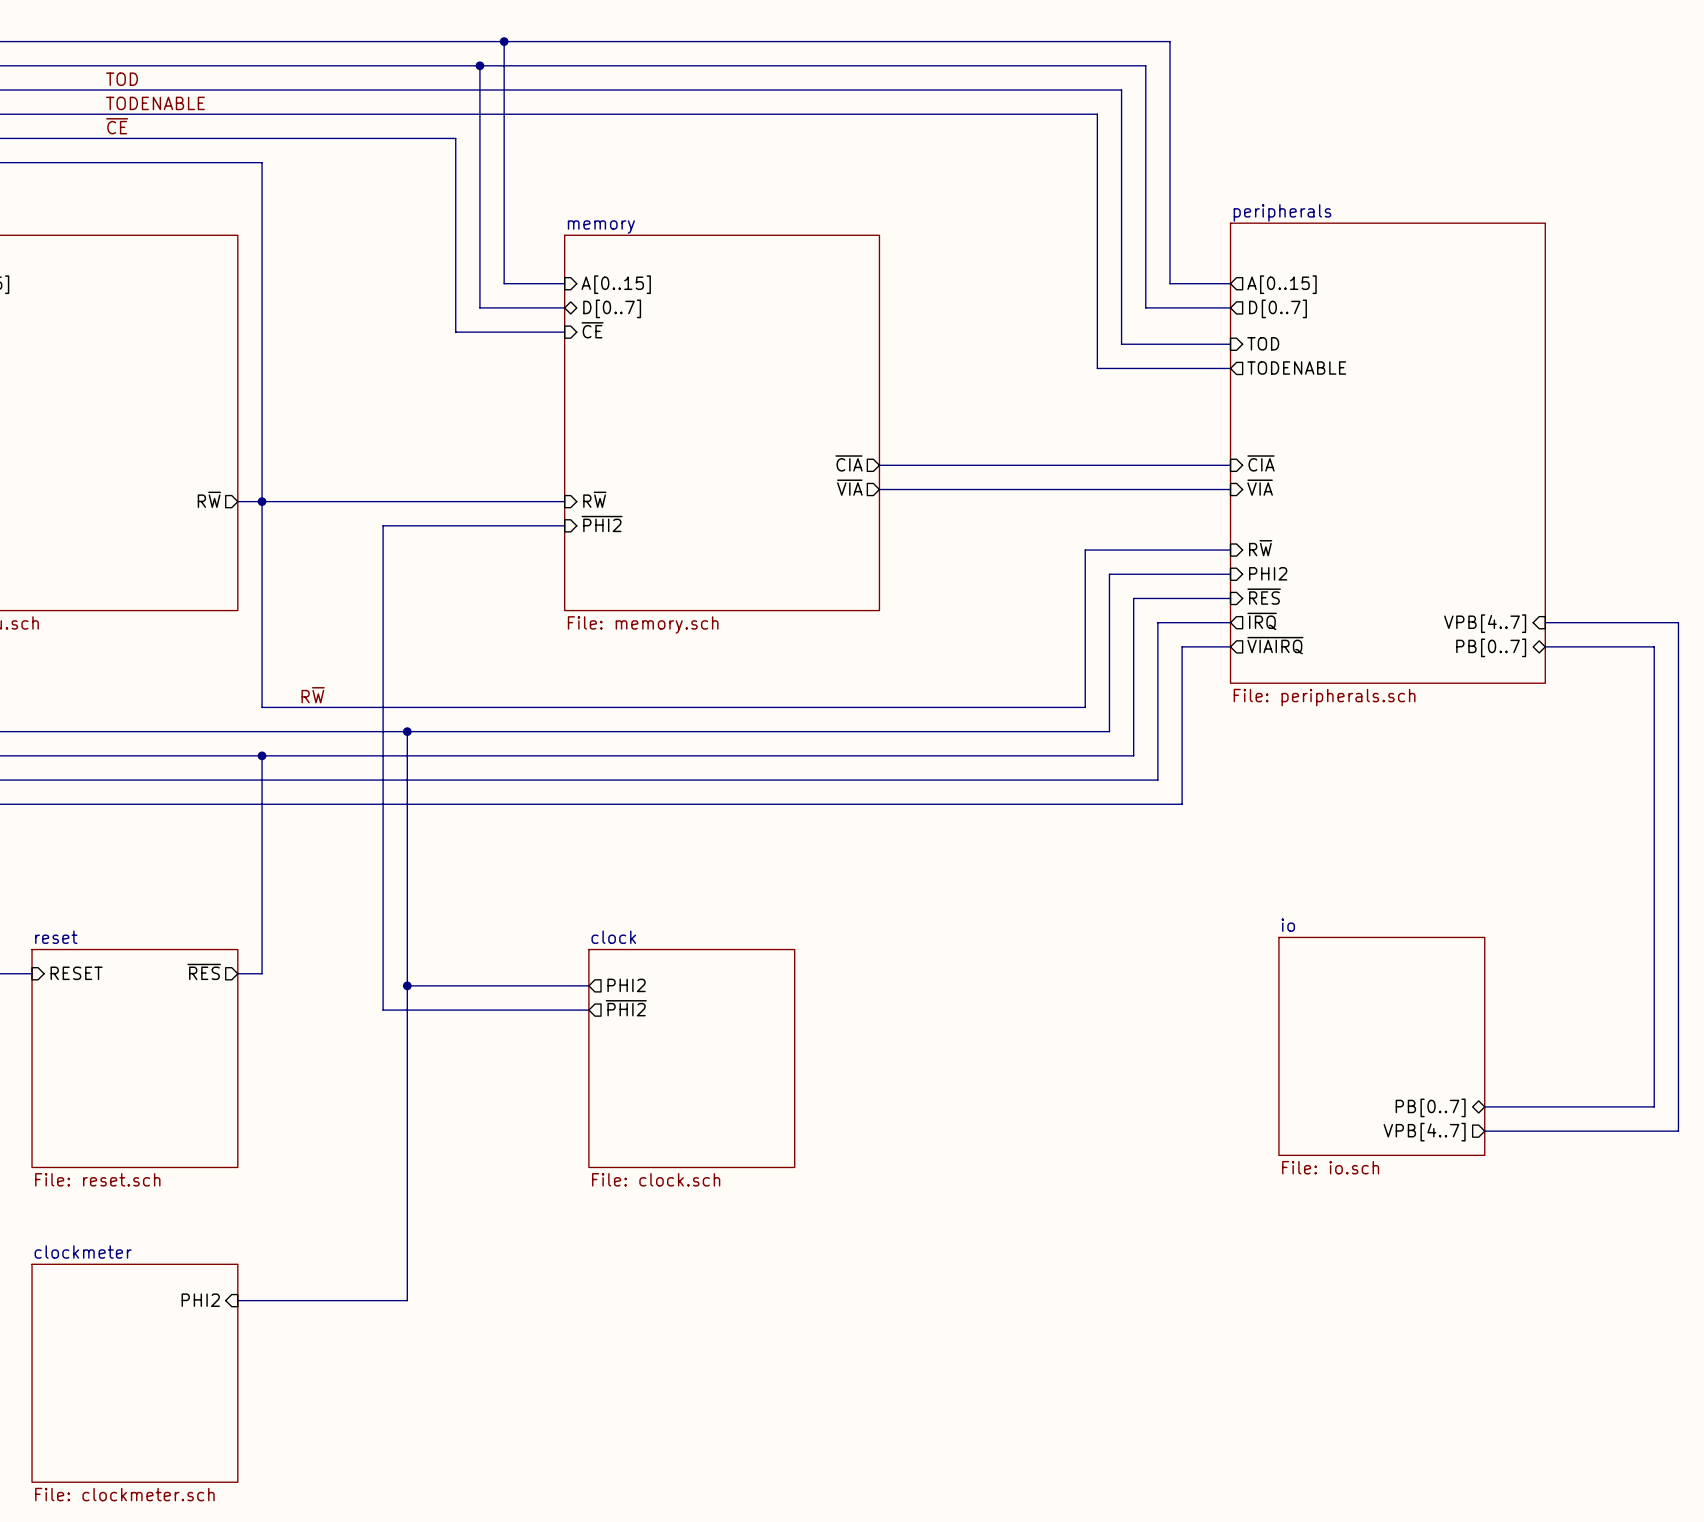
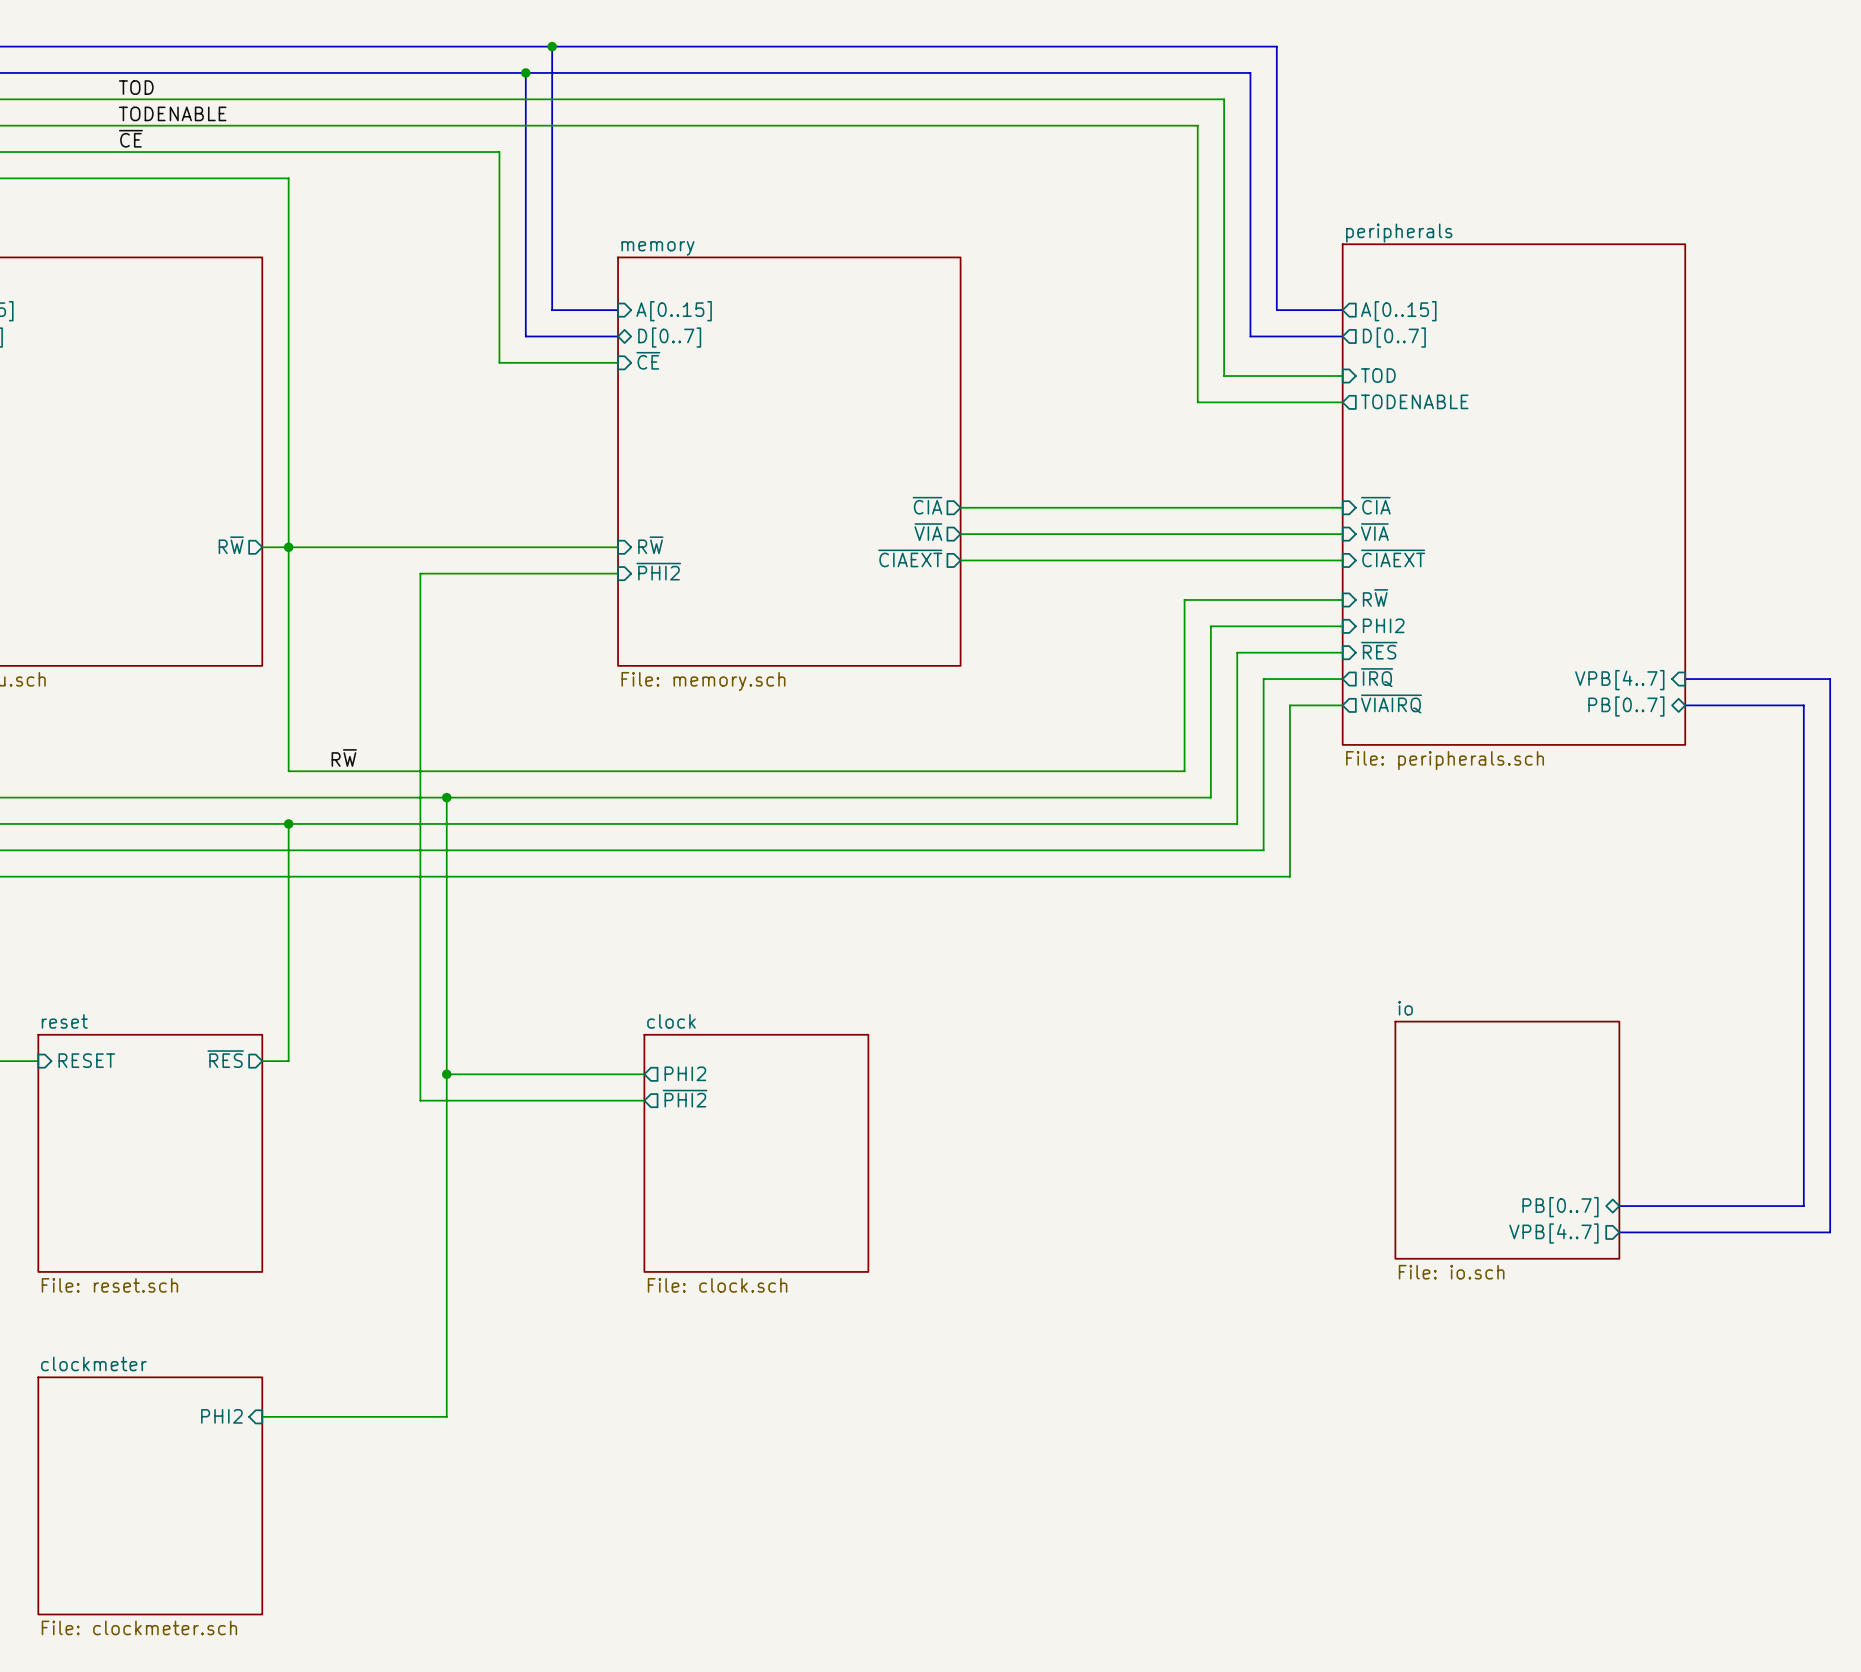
sheet pin: none -> ~{CIAEXT} (910, 558)
sheet pin: none -> ~{CIAEXT} (1393, 558)
wire: none -> (960, 560) (1342, 560)

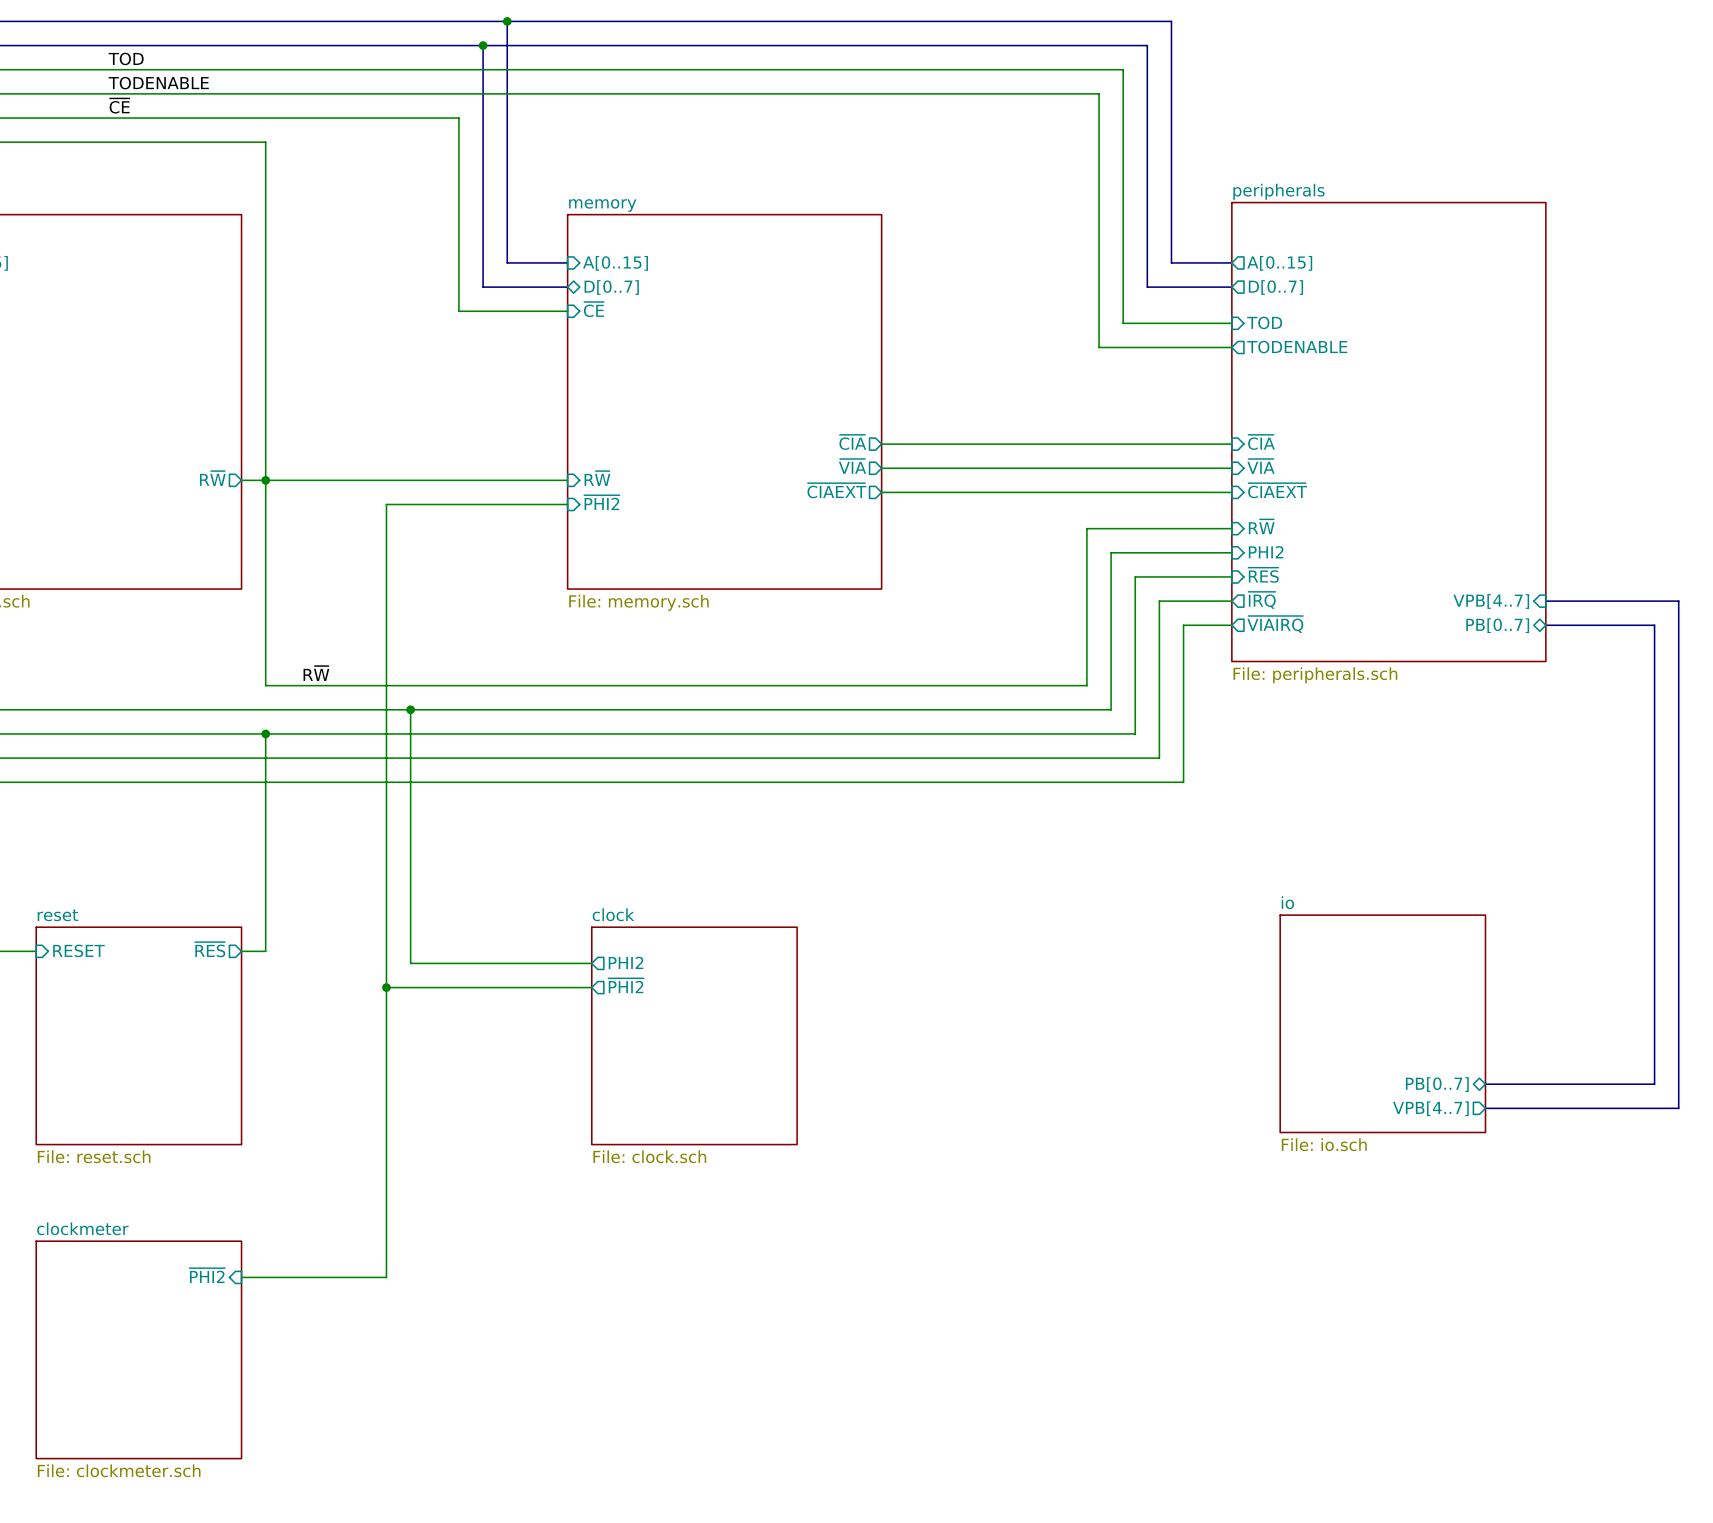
wire: (446, 1074) (446, 1416) (420, 1416) -> (386, 987) (386, 1277)
junction position: (446, 1074) -> (386, 987)
sheet pin: PHI2 (221, 1416) -> ~{PHI2} (207, 1275)

